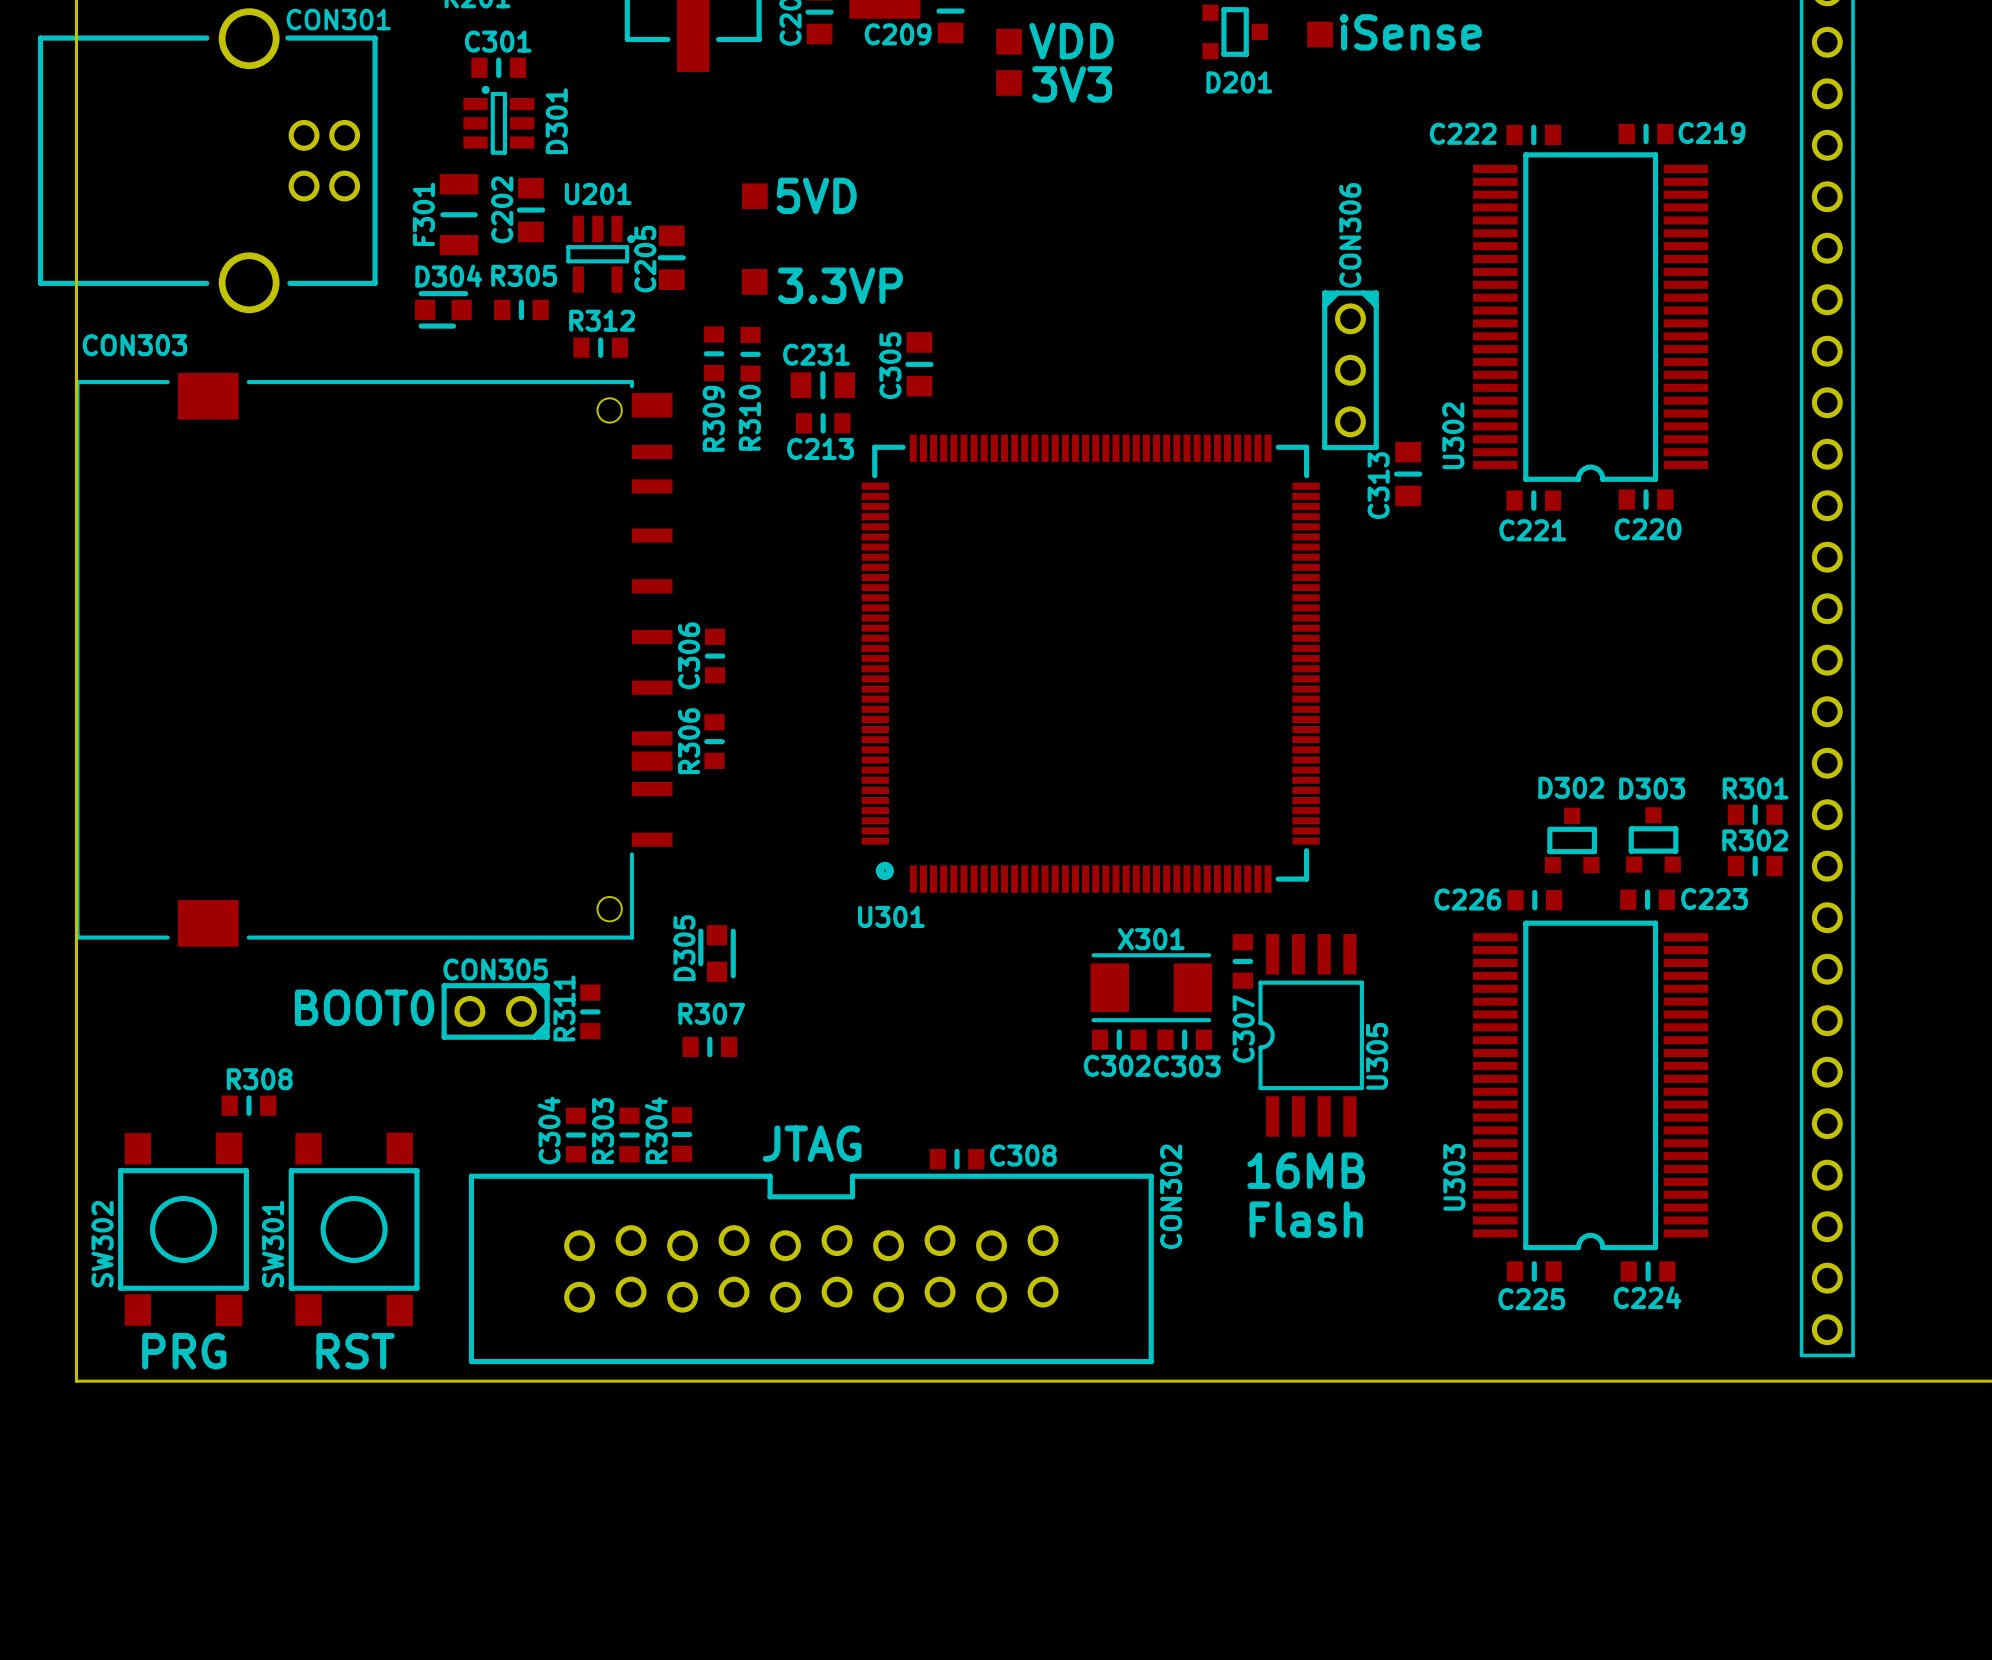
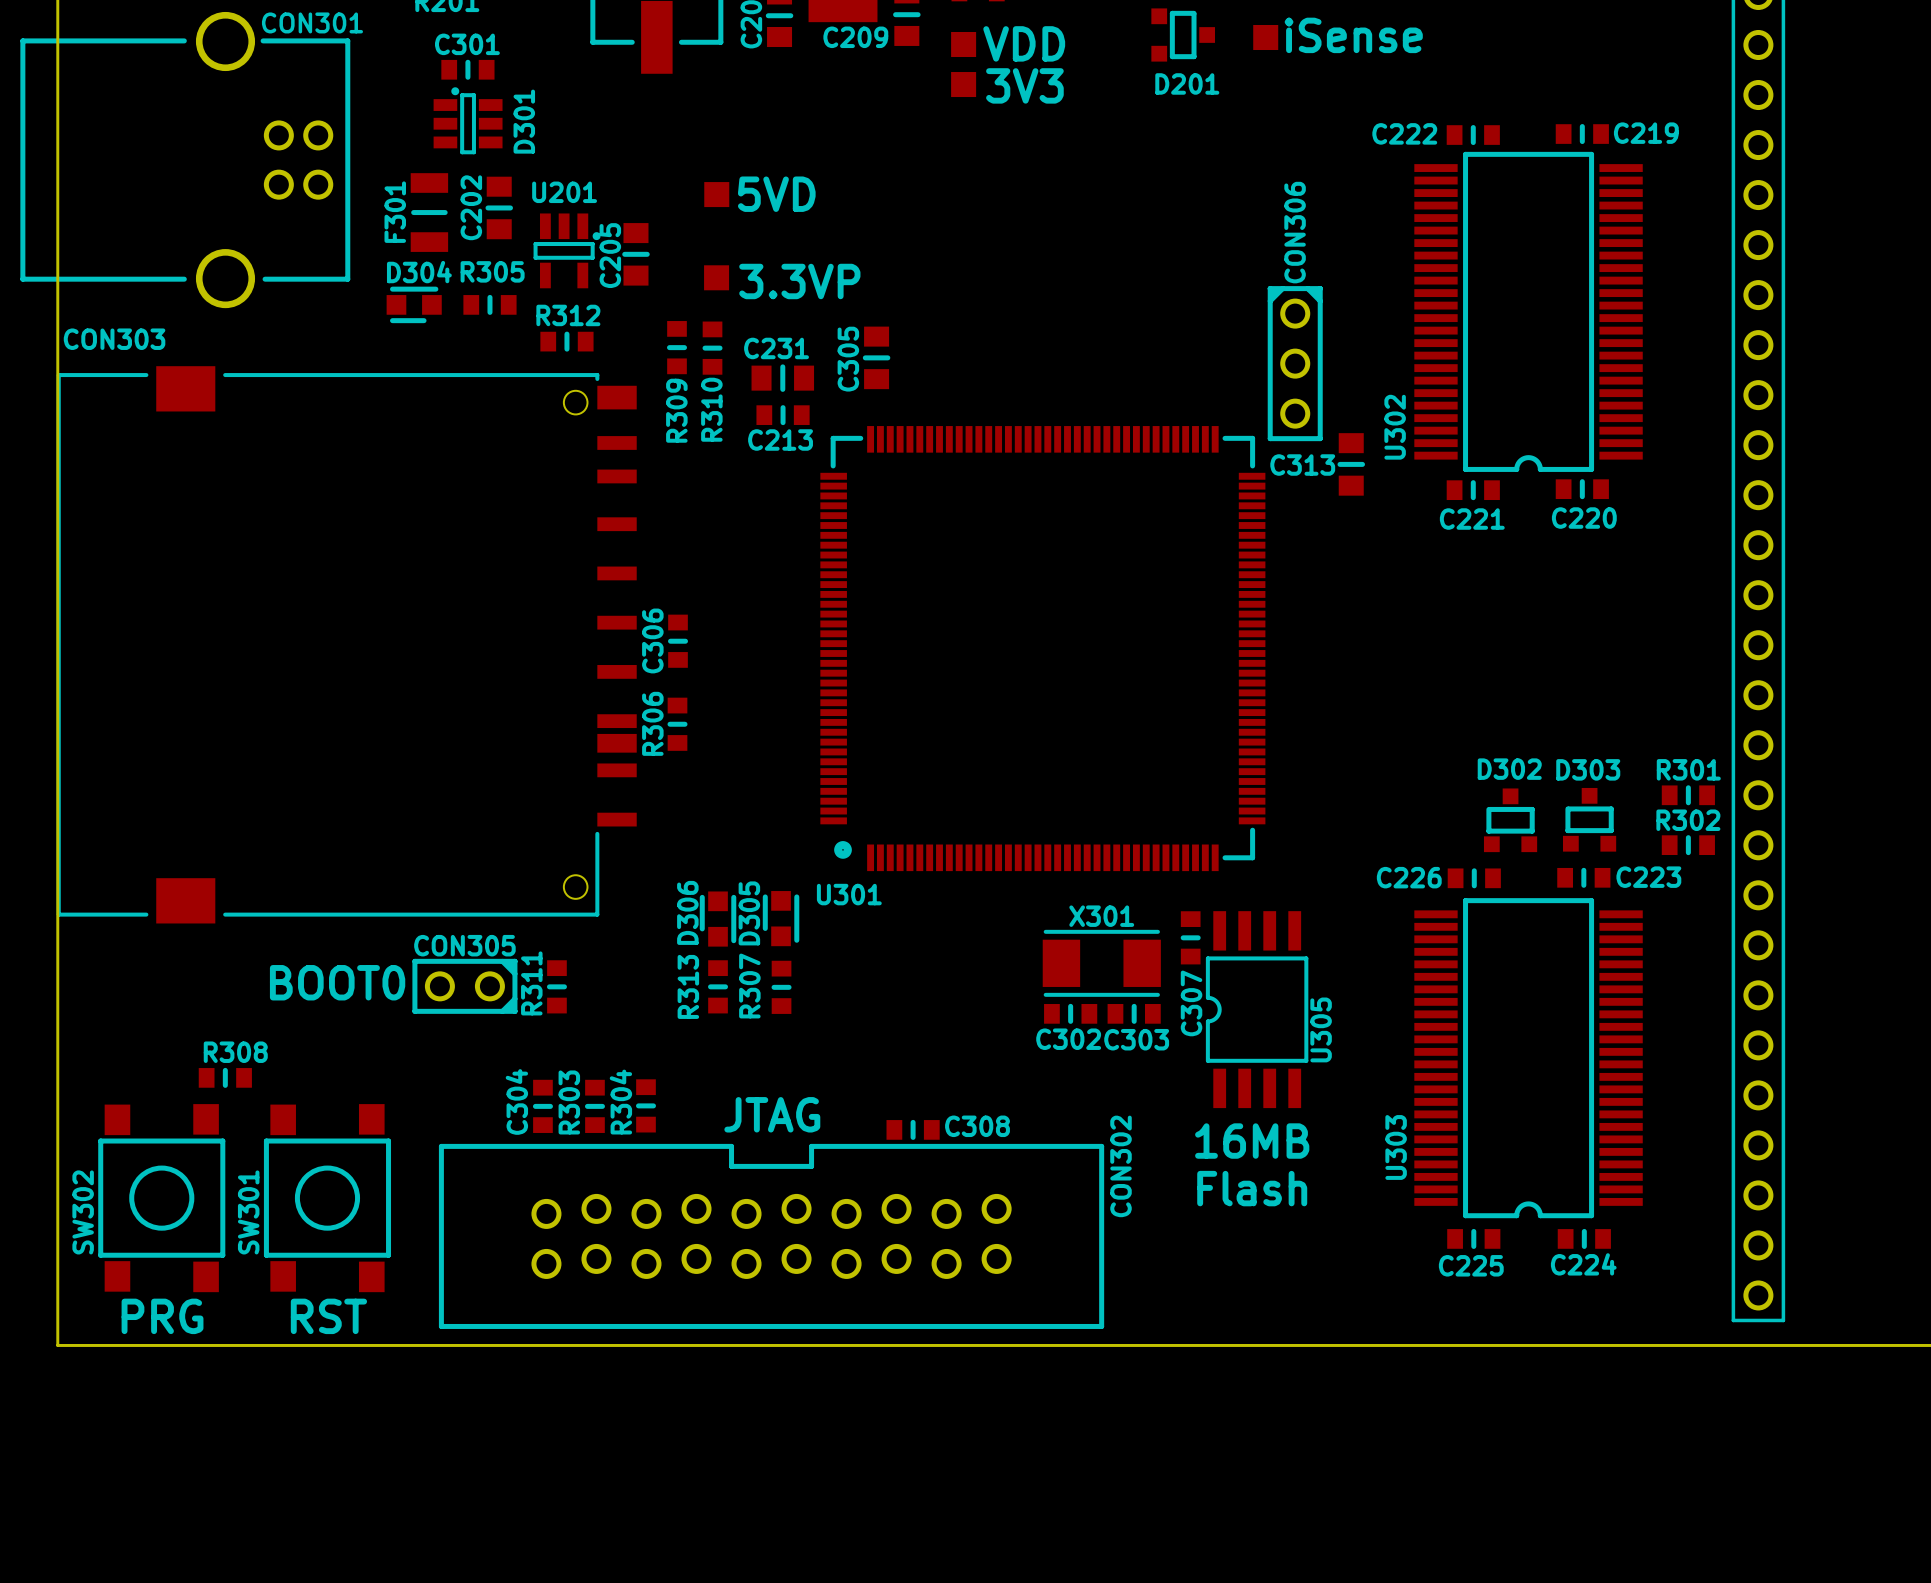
C313 name rotation: 0° (1378, 485) -> 90° clockwise (1302, 465)
D306: none -> (718, 919)
D305 position: (717, 953) -> (781, 918)
R313: none -> (718, 986)
R307 name position: R307 (711, 1013) -> R307 (749, 986)
R307 rotation: 0° (709, 1046) -> 90° clockwise (781, 987)
R307 position: (709, 1046) -> (781, 987)

